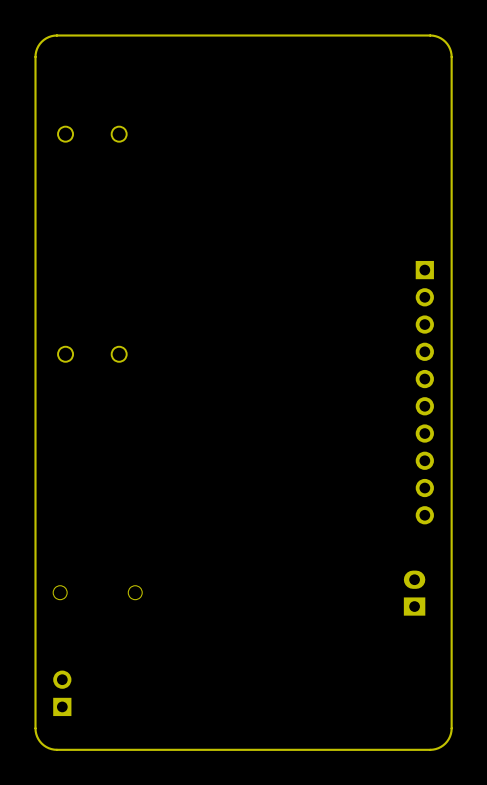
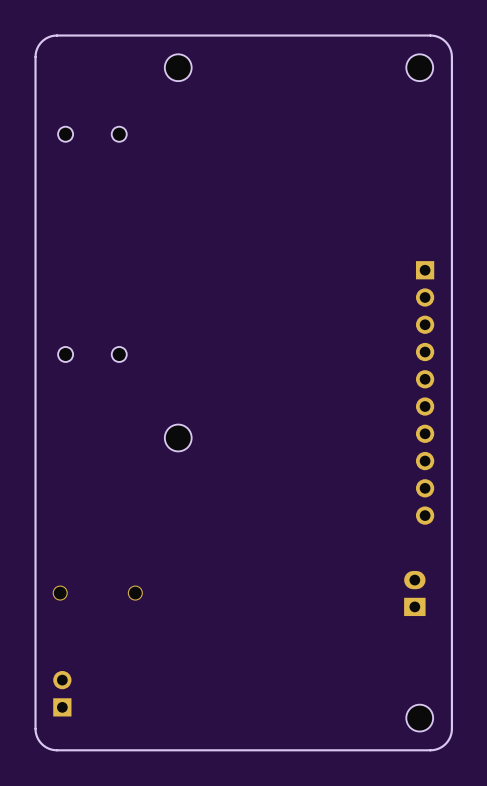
part: none -> (178, 67)
part: none -> (419, 67)
part: none -> (178, 437)
part: none -> (419, 718)

